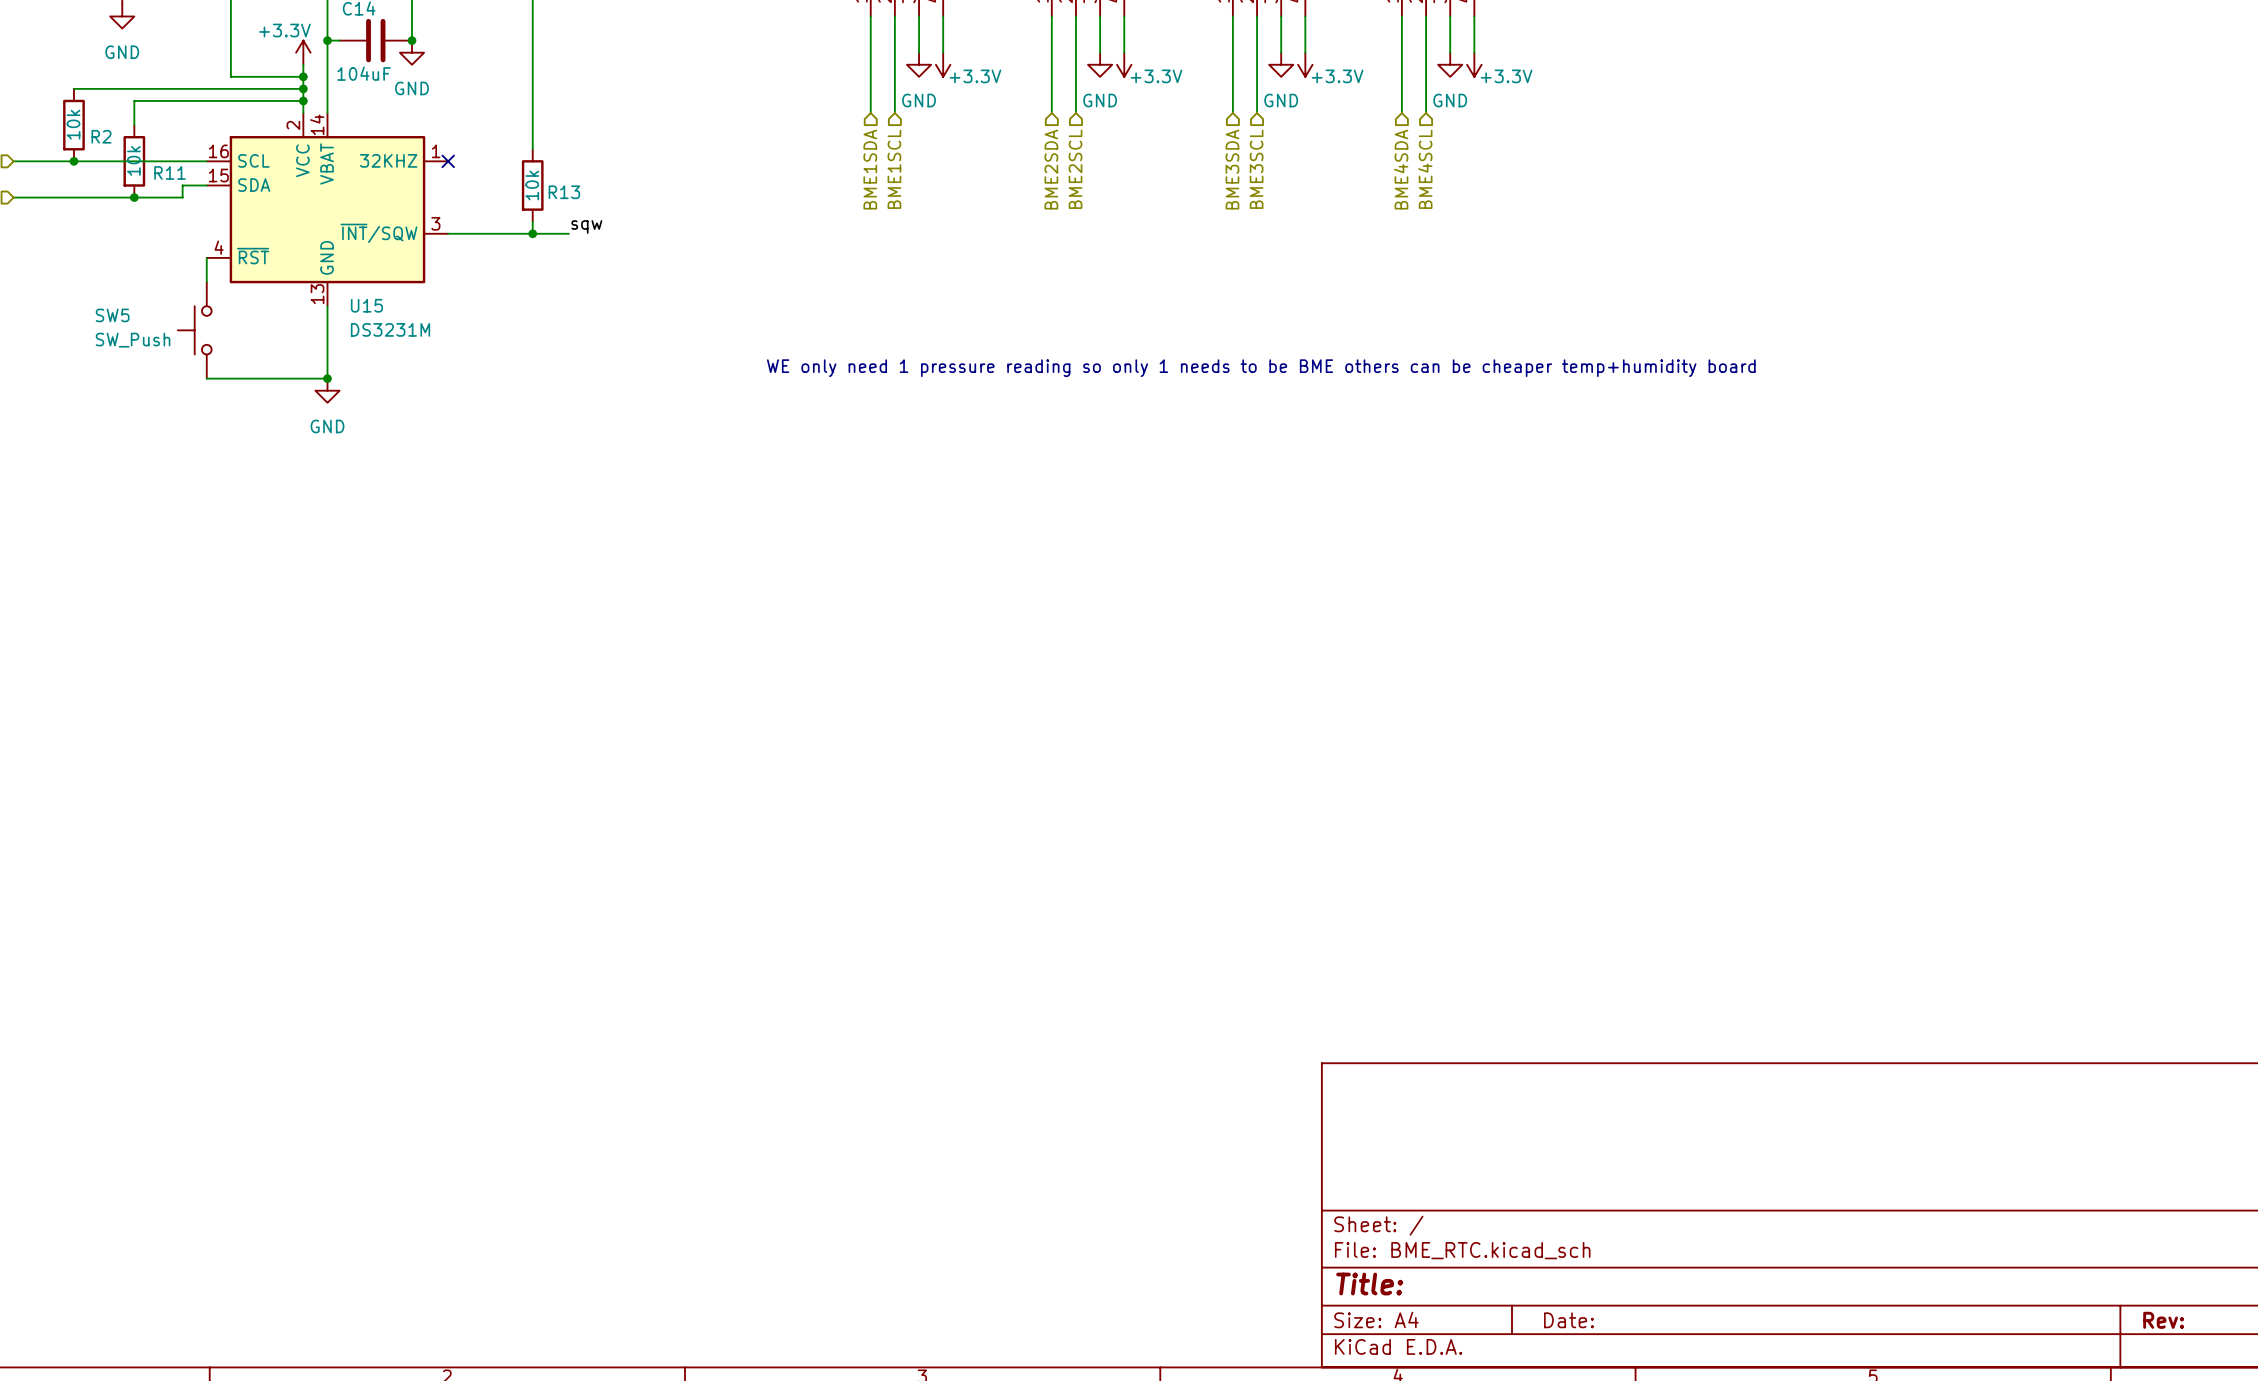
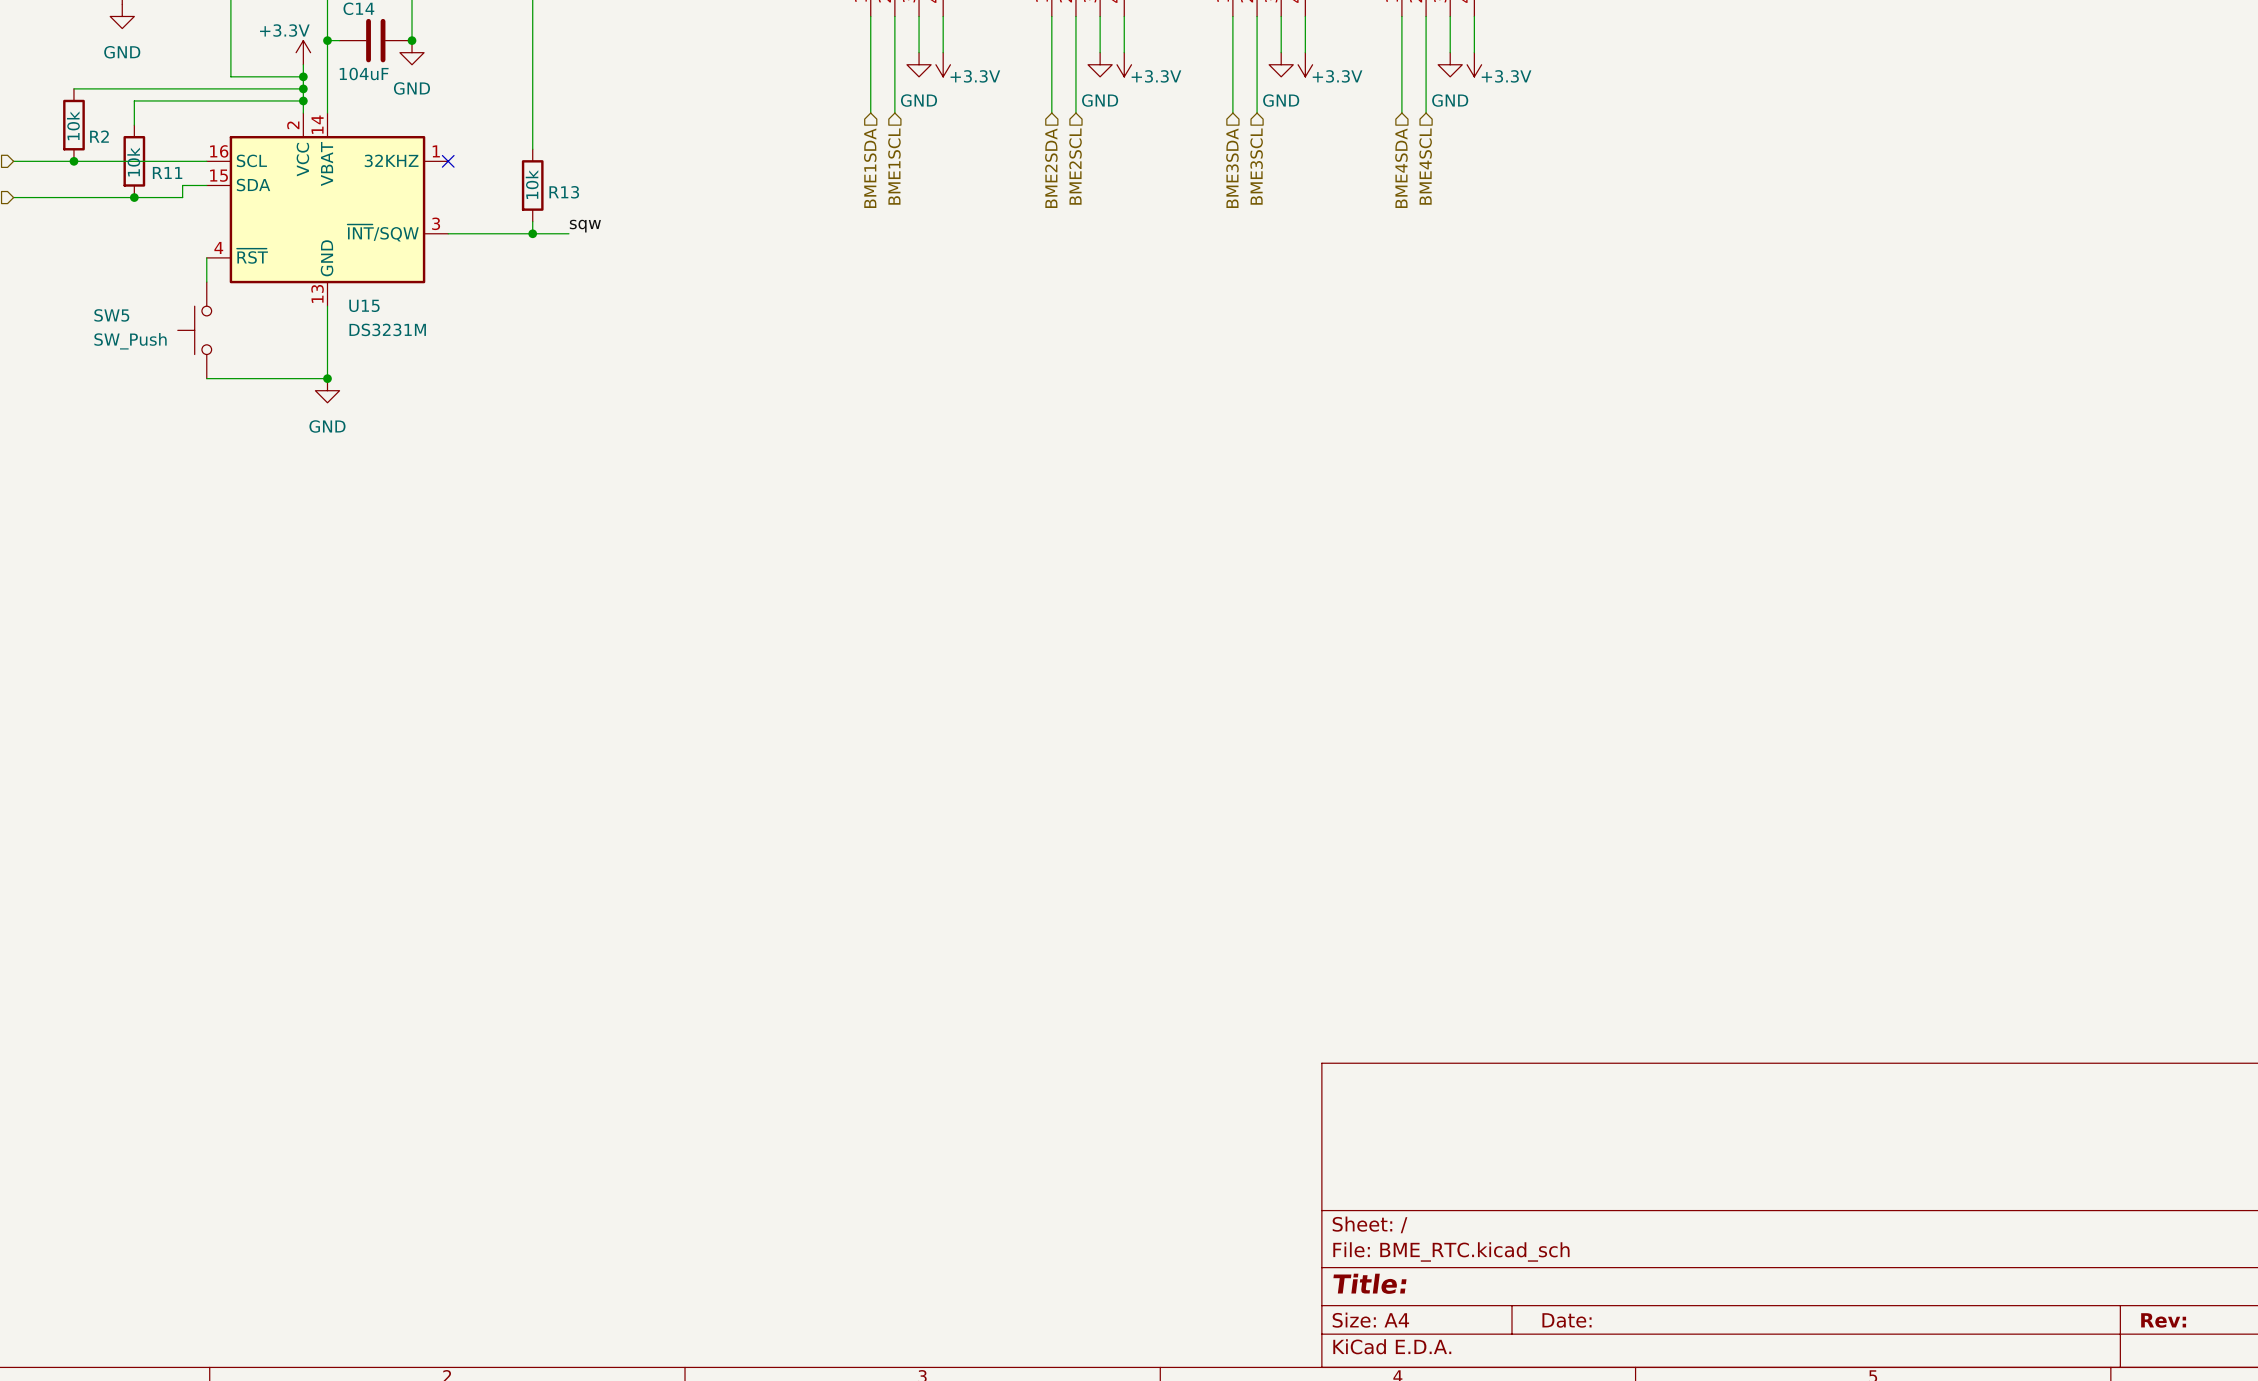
text: WE only need 1 pressure reading so only 1 needs to be BME others can be cheaper temp+humidity board (1261, 368) -> none

